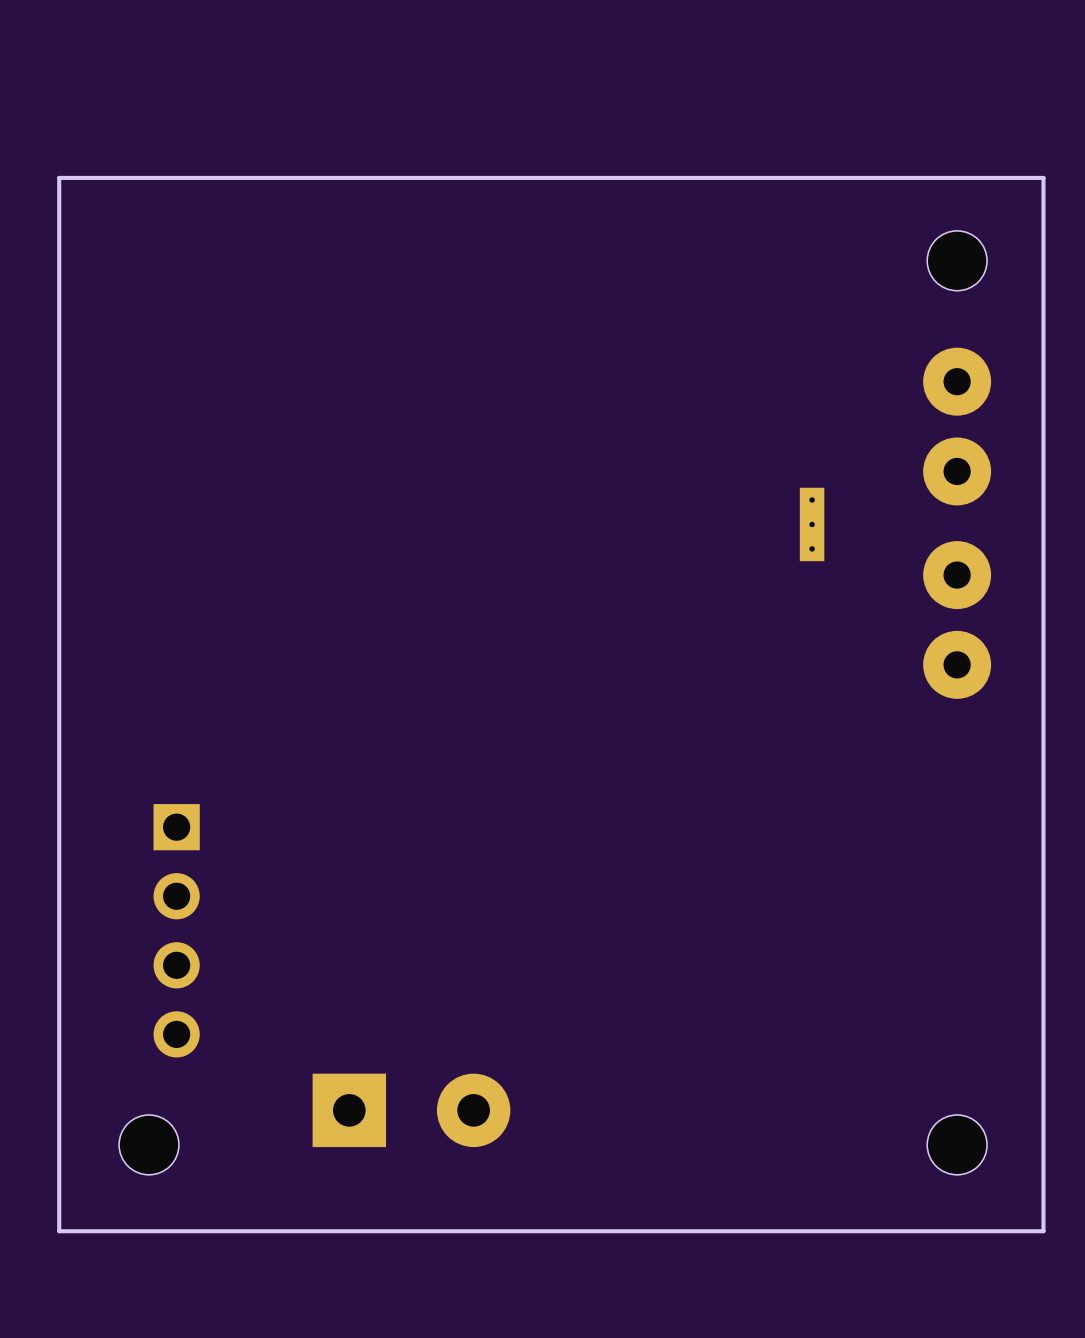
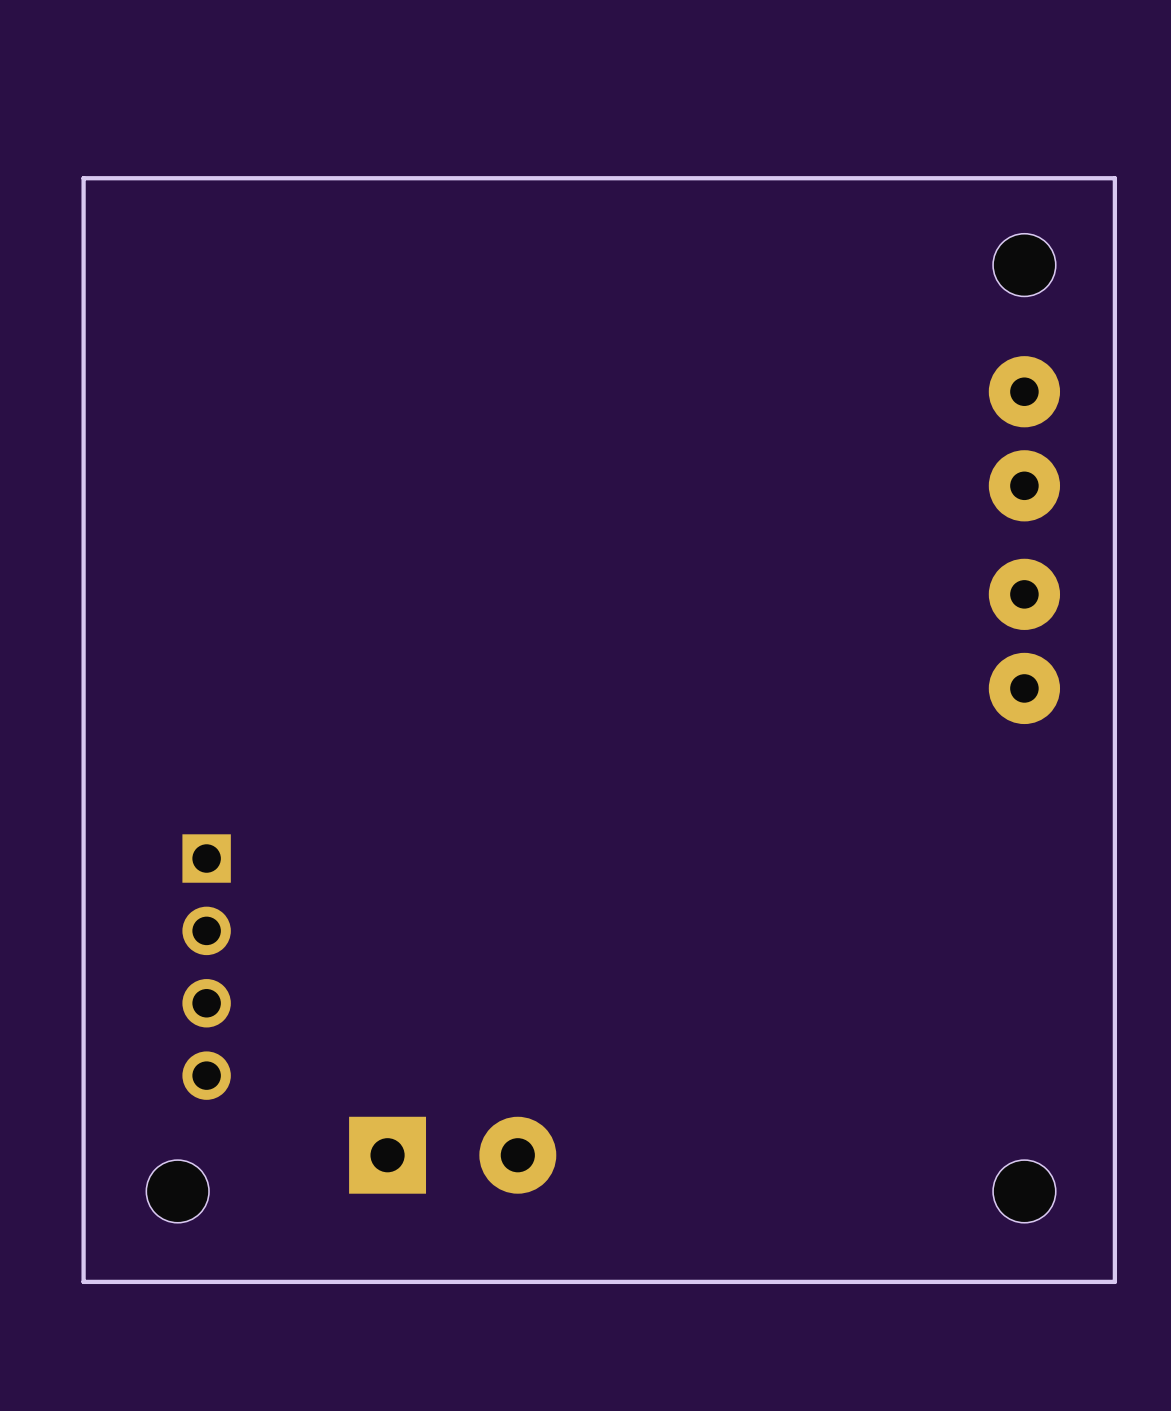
part: (812, 524) -> none

